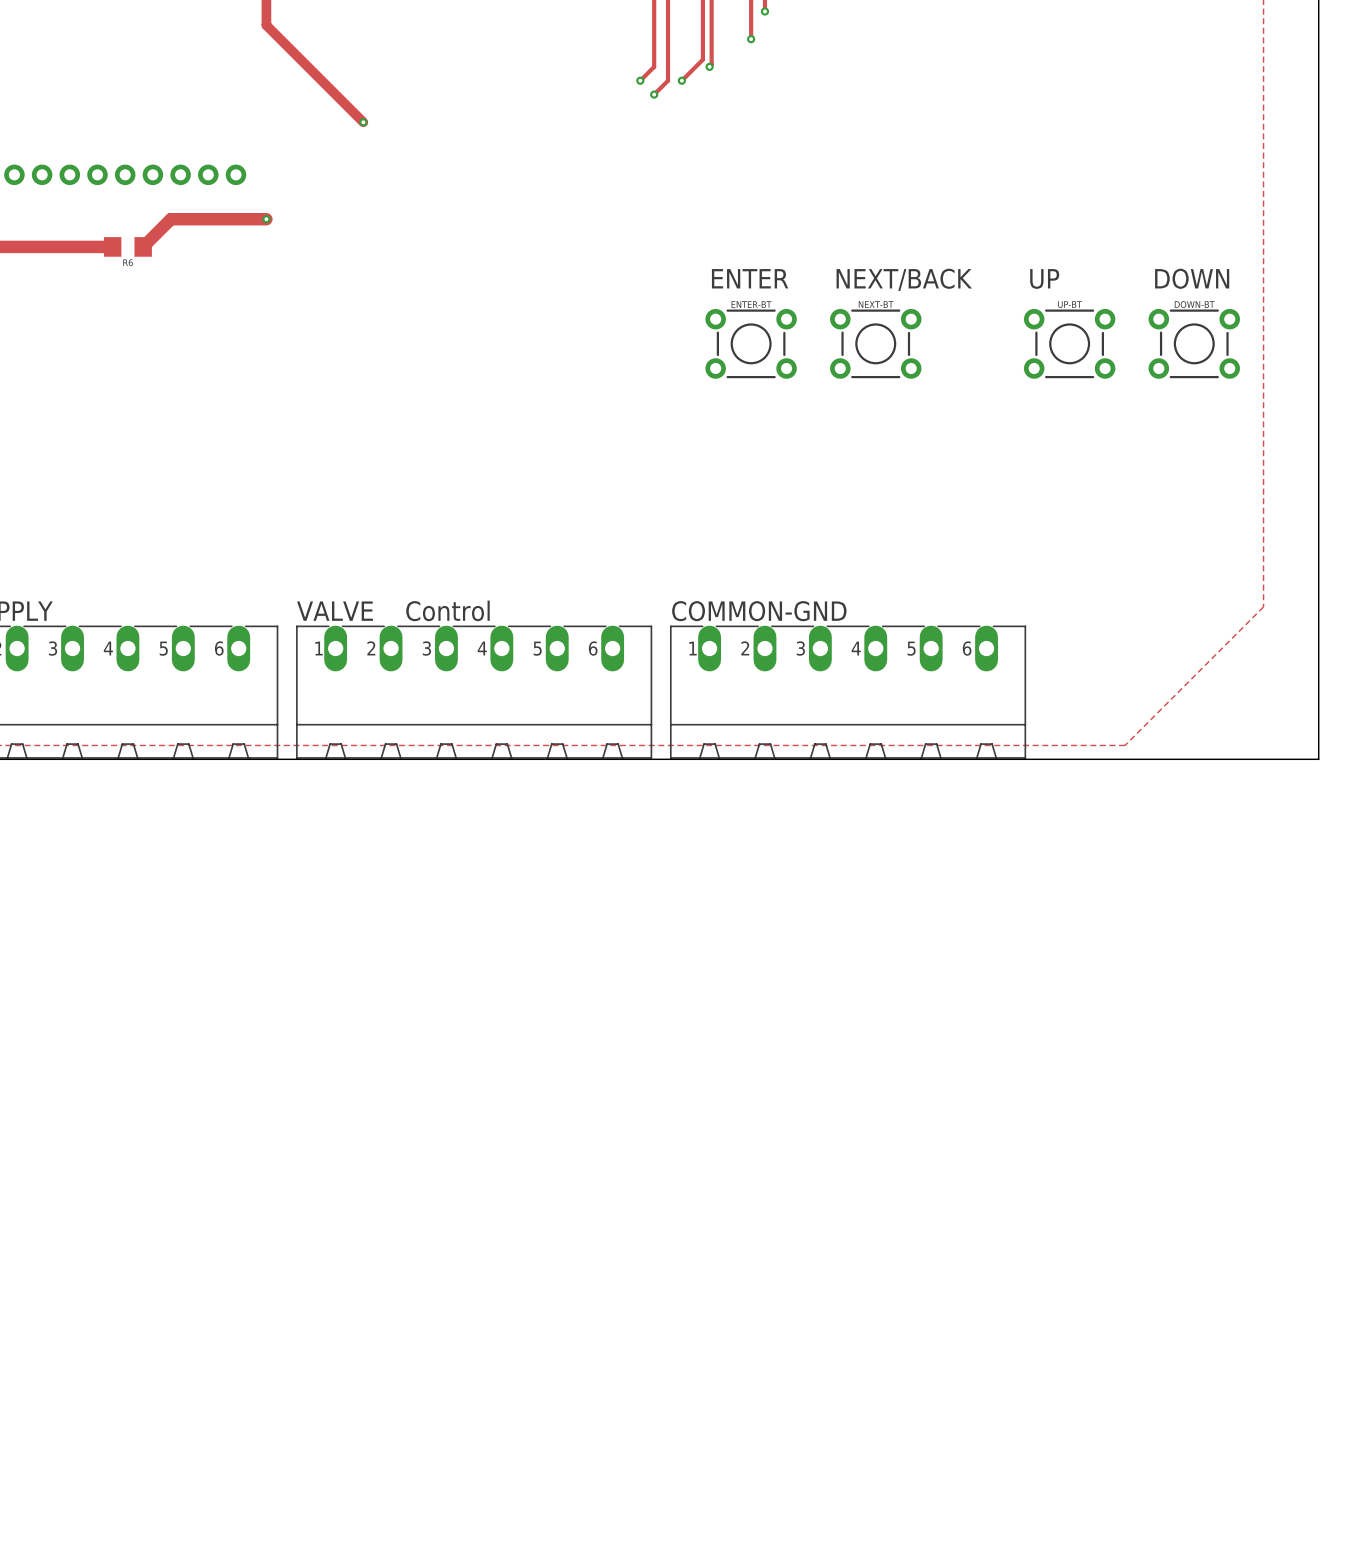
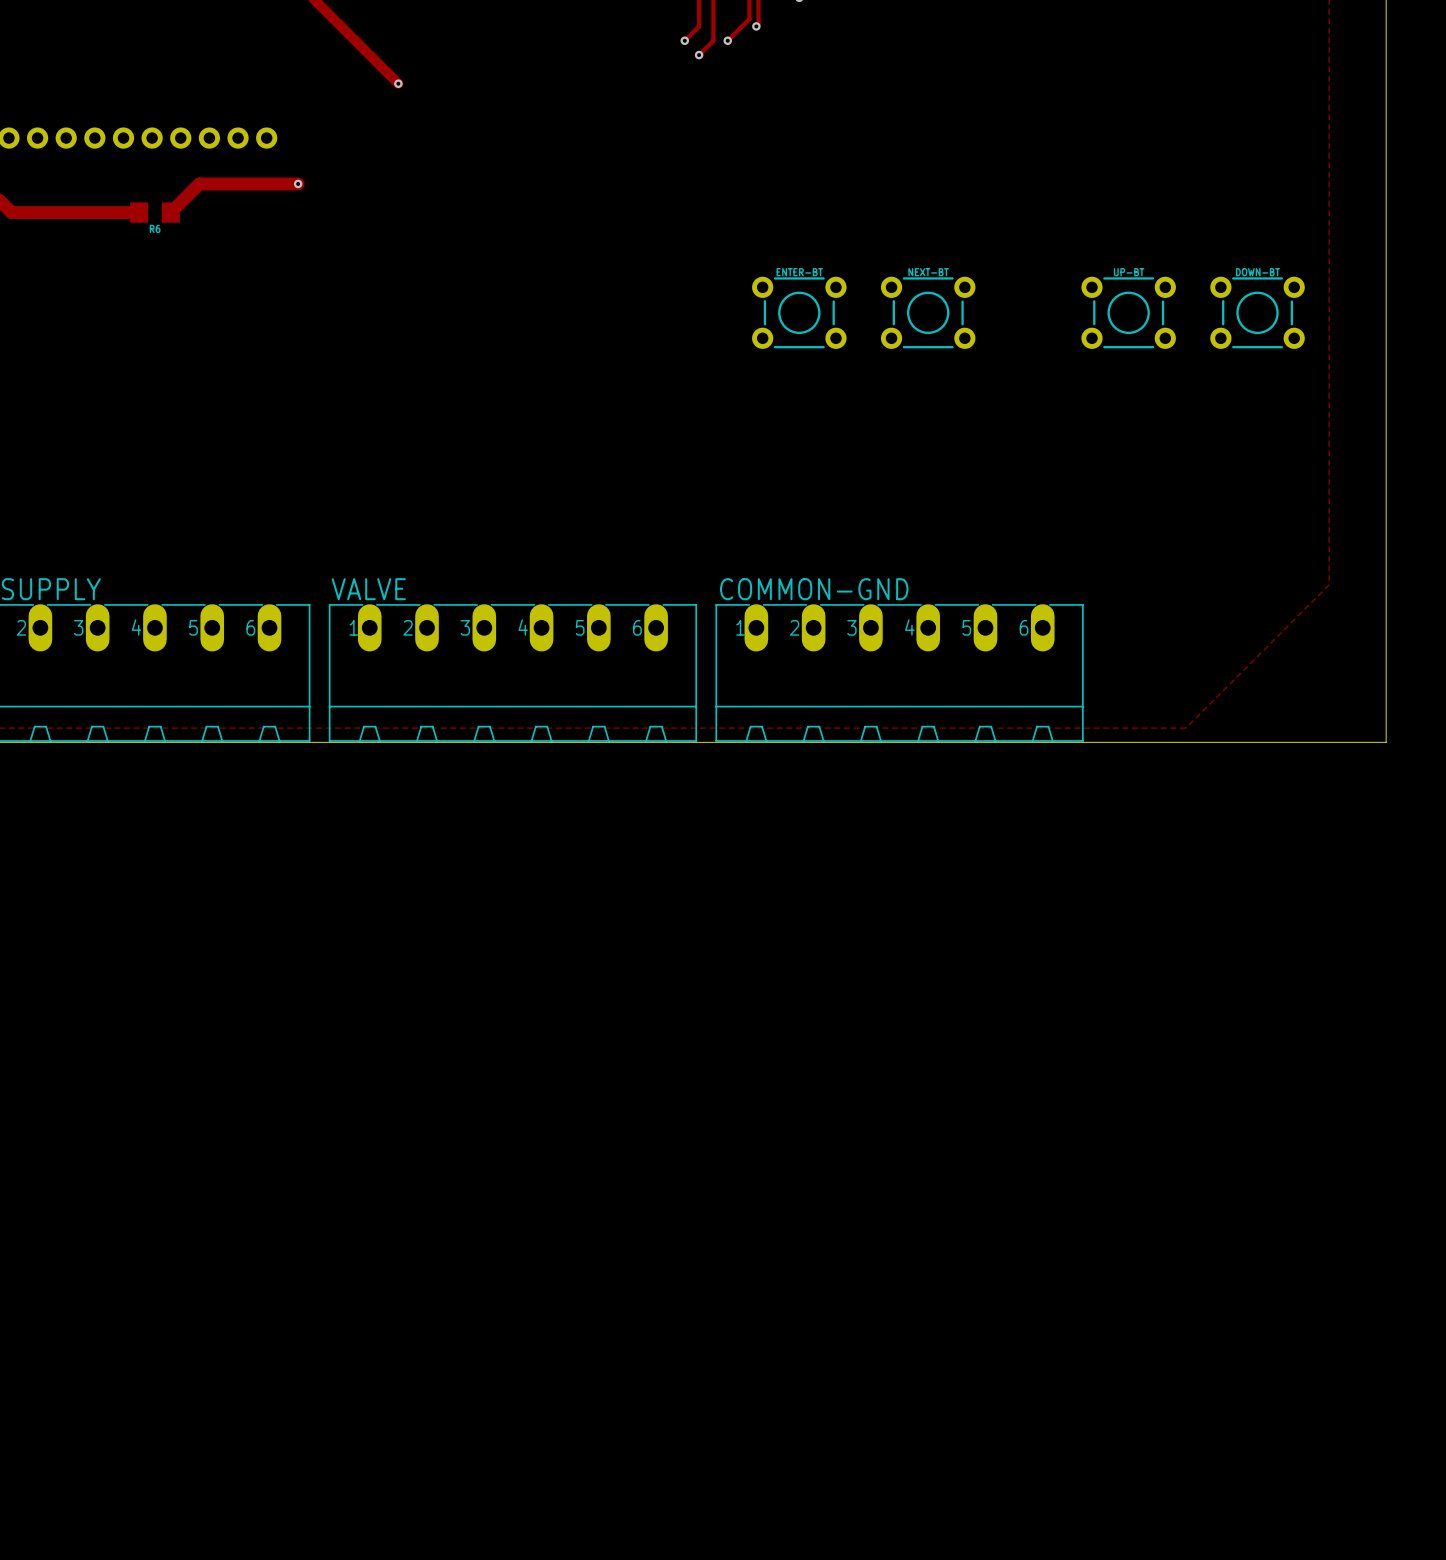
text: ENTER (750, 278) -> none
text: UP (1044, 278) -> none
text: DOWN (1192, 278) -> none
text: NEXT/BACK (904, 279) -> none
text: Control (447, 610) -> none

